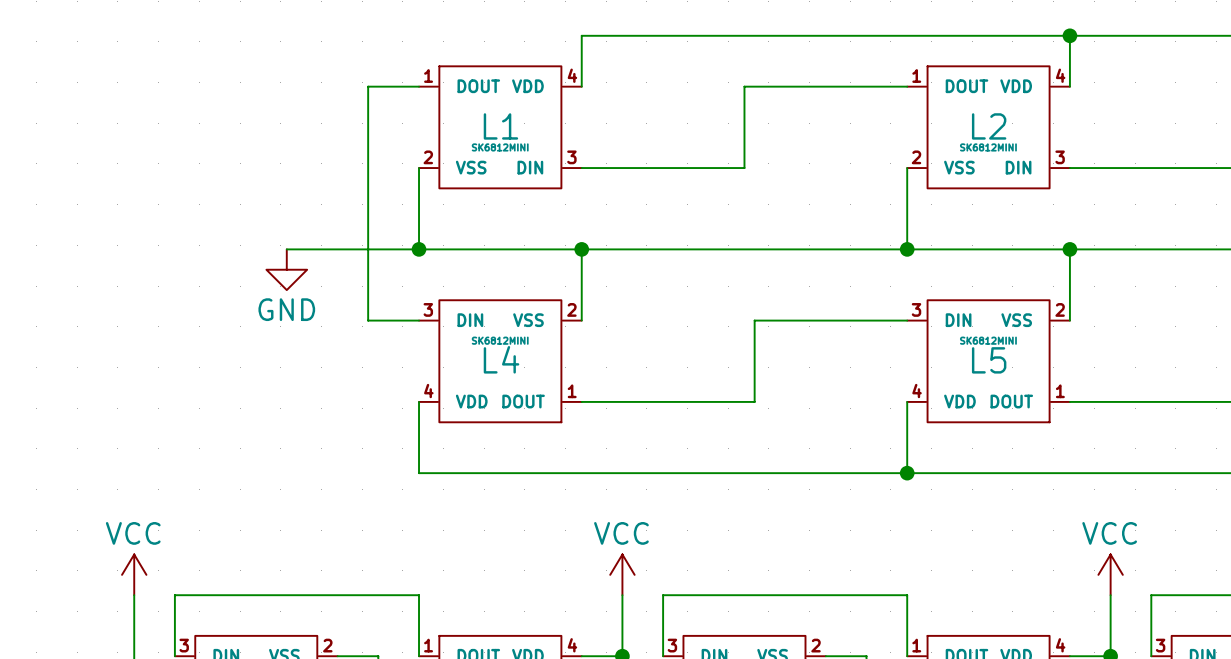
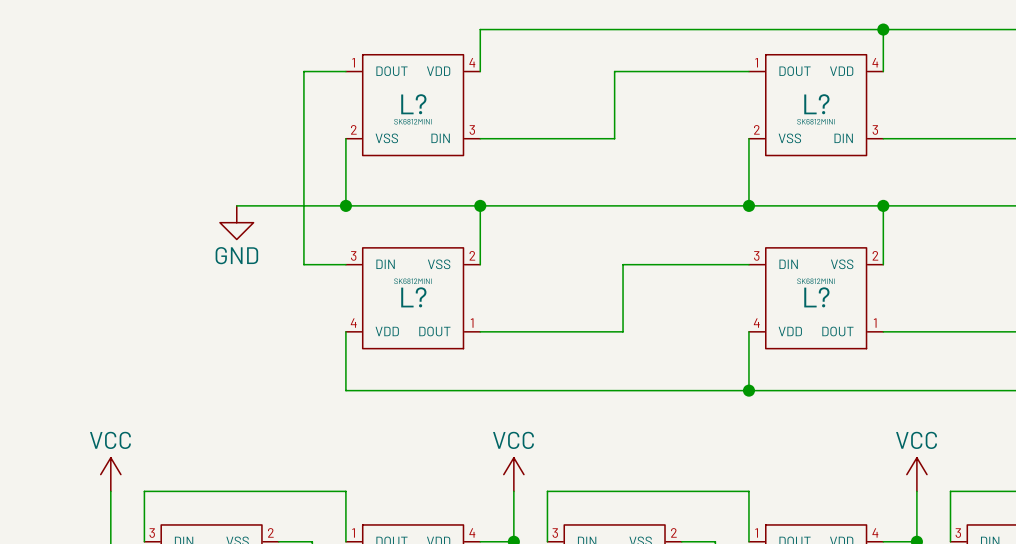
L1 name: L1 (500, 126) -> L? (413, 104)
L2 name: L2 (989, 126) -> L? (816, 104)
L4 name: L4 (501, 359) -> L? (413, 297)
L5 name: L5 (989, 360) -> L? (816, 297)

